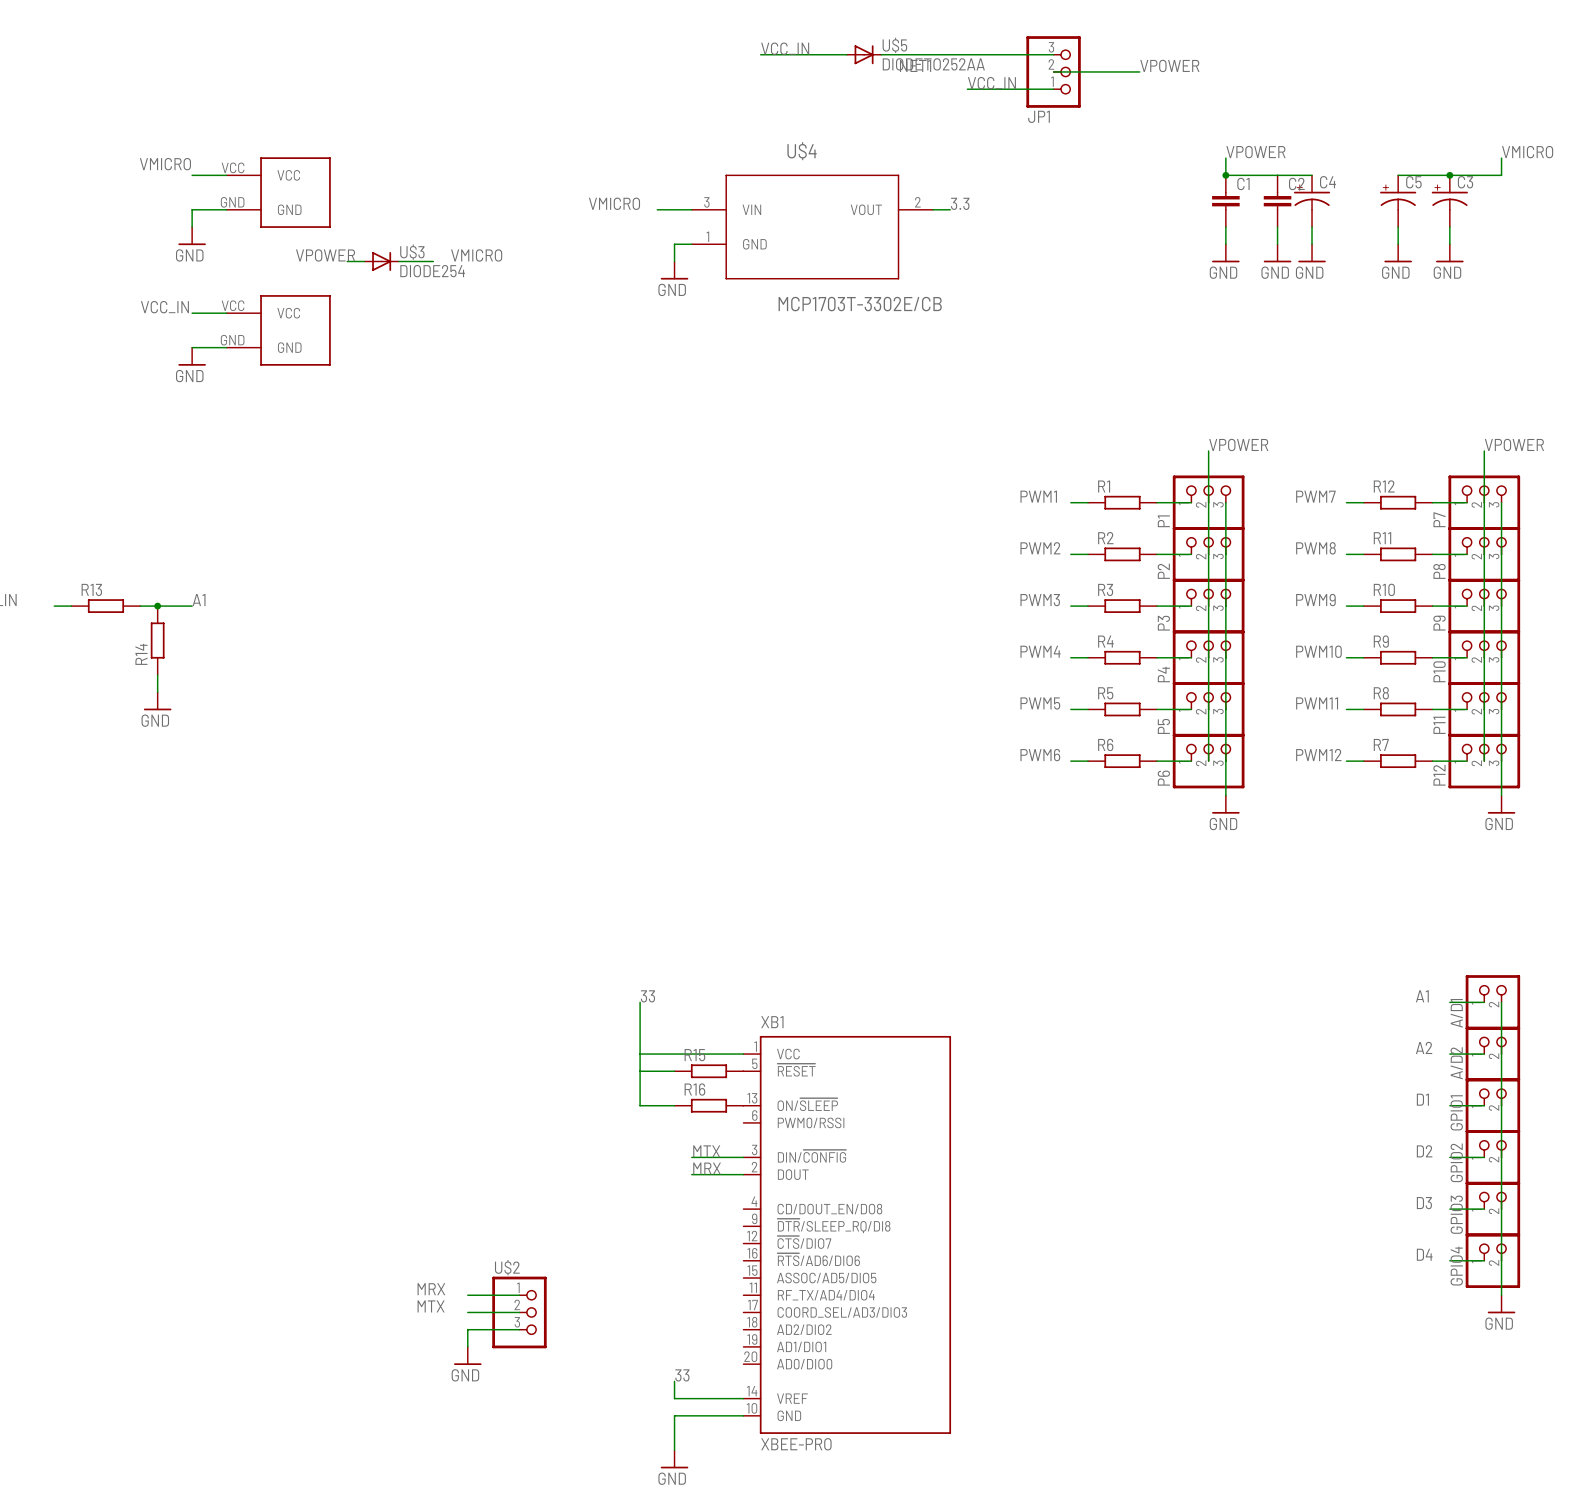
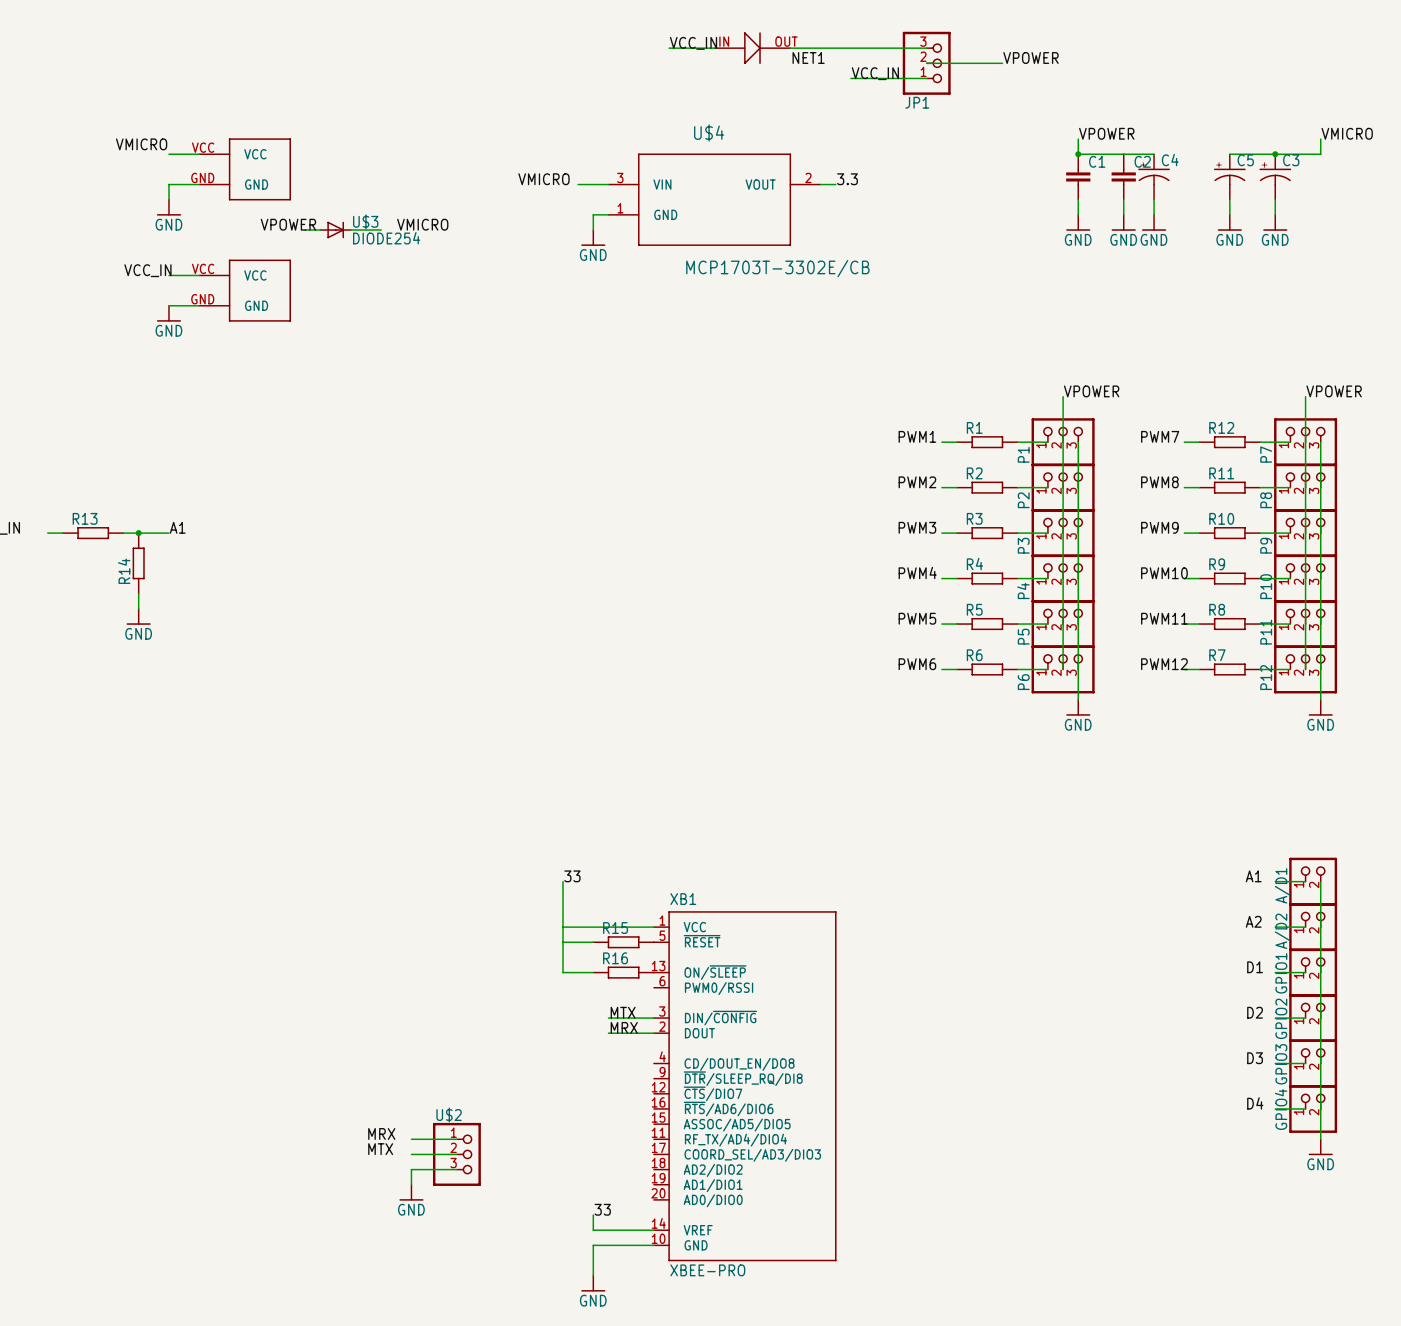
part: none -> (752, 48)
U$5: DIODETO252AA (864, 54) -> none

